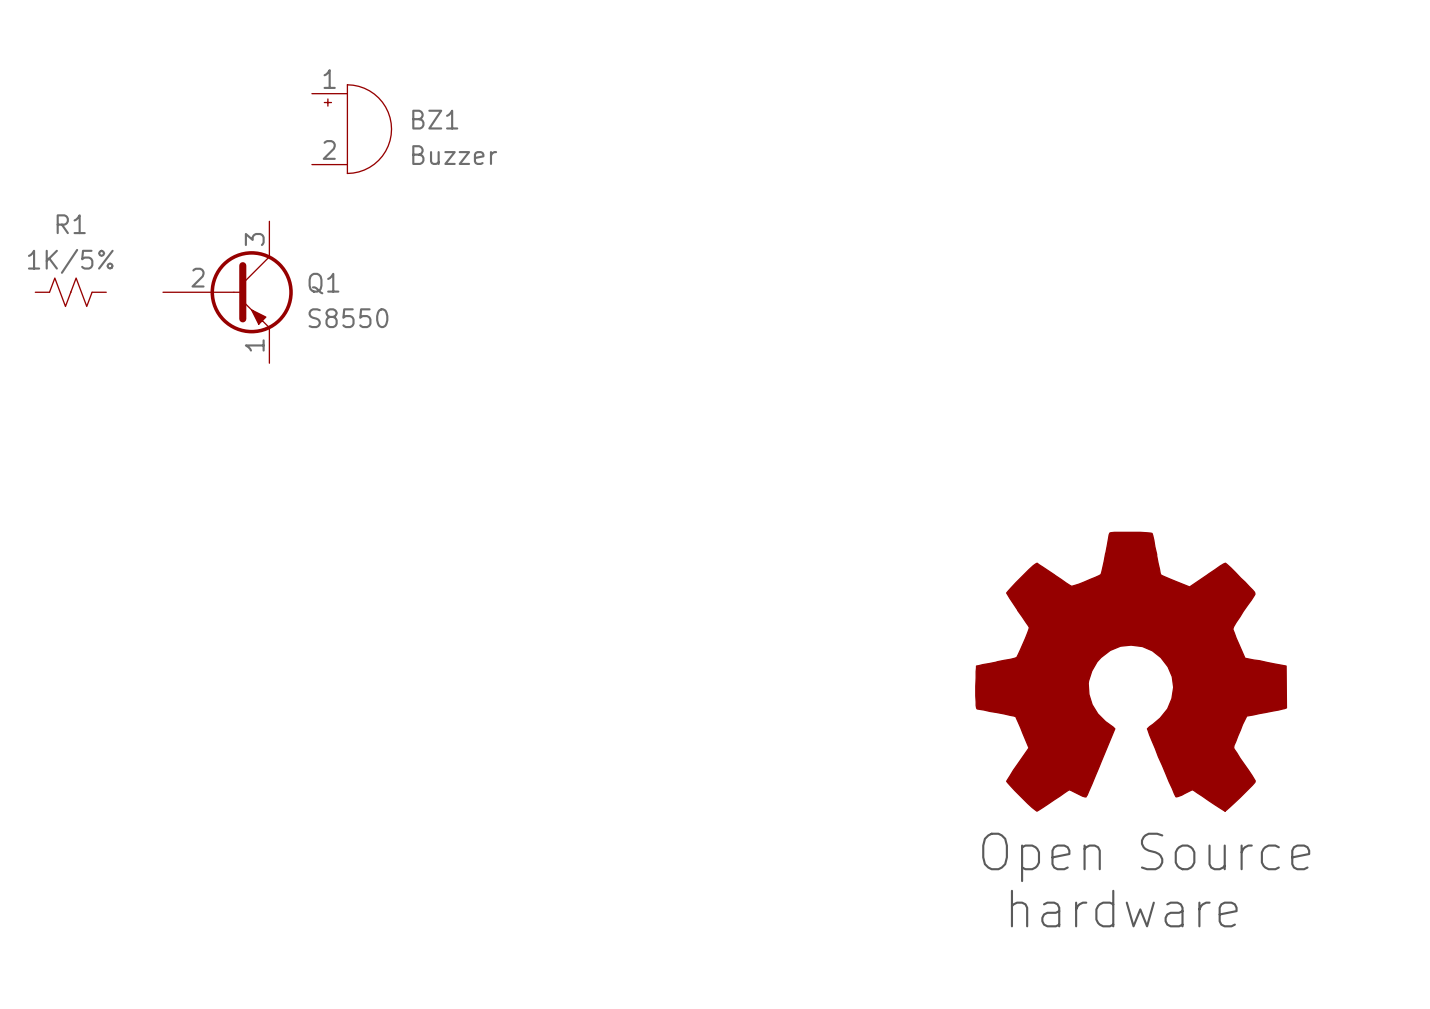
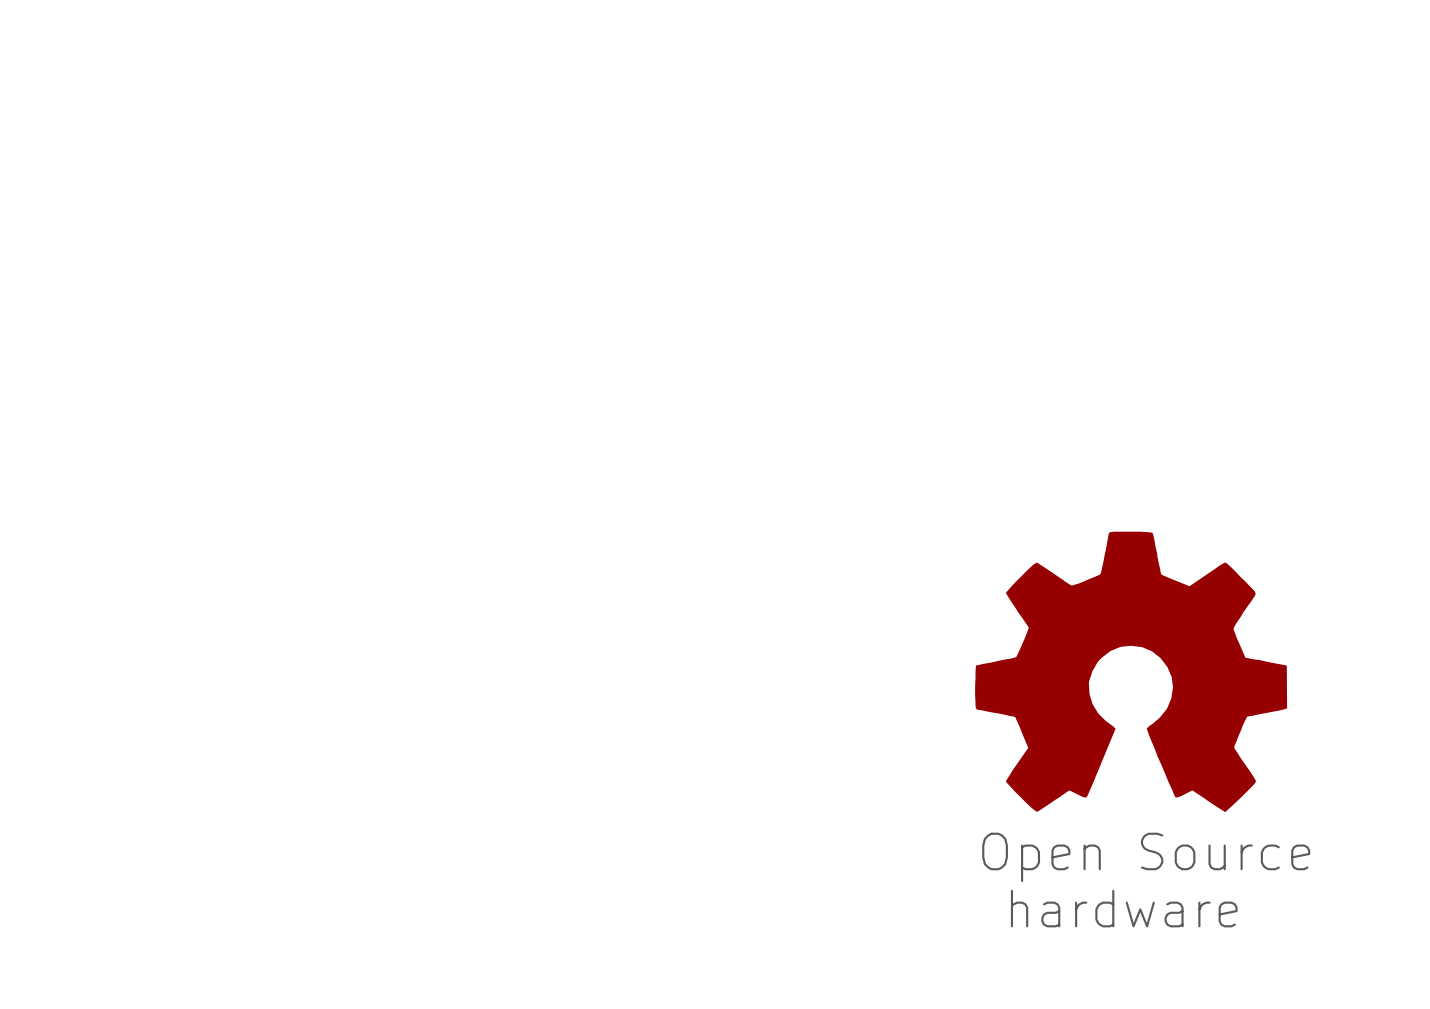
BZ1: Buzzer (351, 129) -> none
R1: 1K/5% (70, 292) -> none
Q1: S8550 (227, 292) -> none

